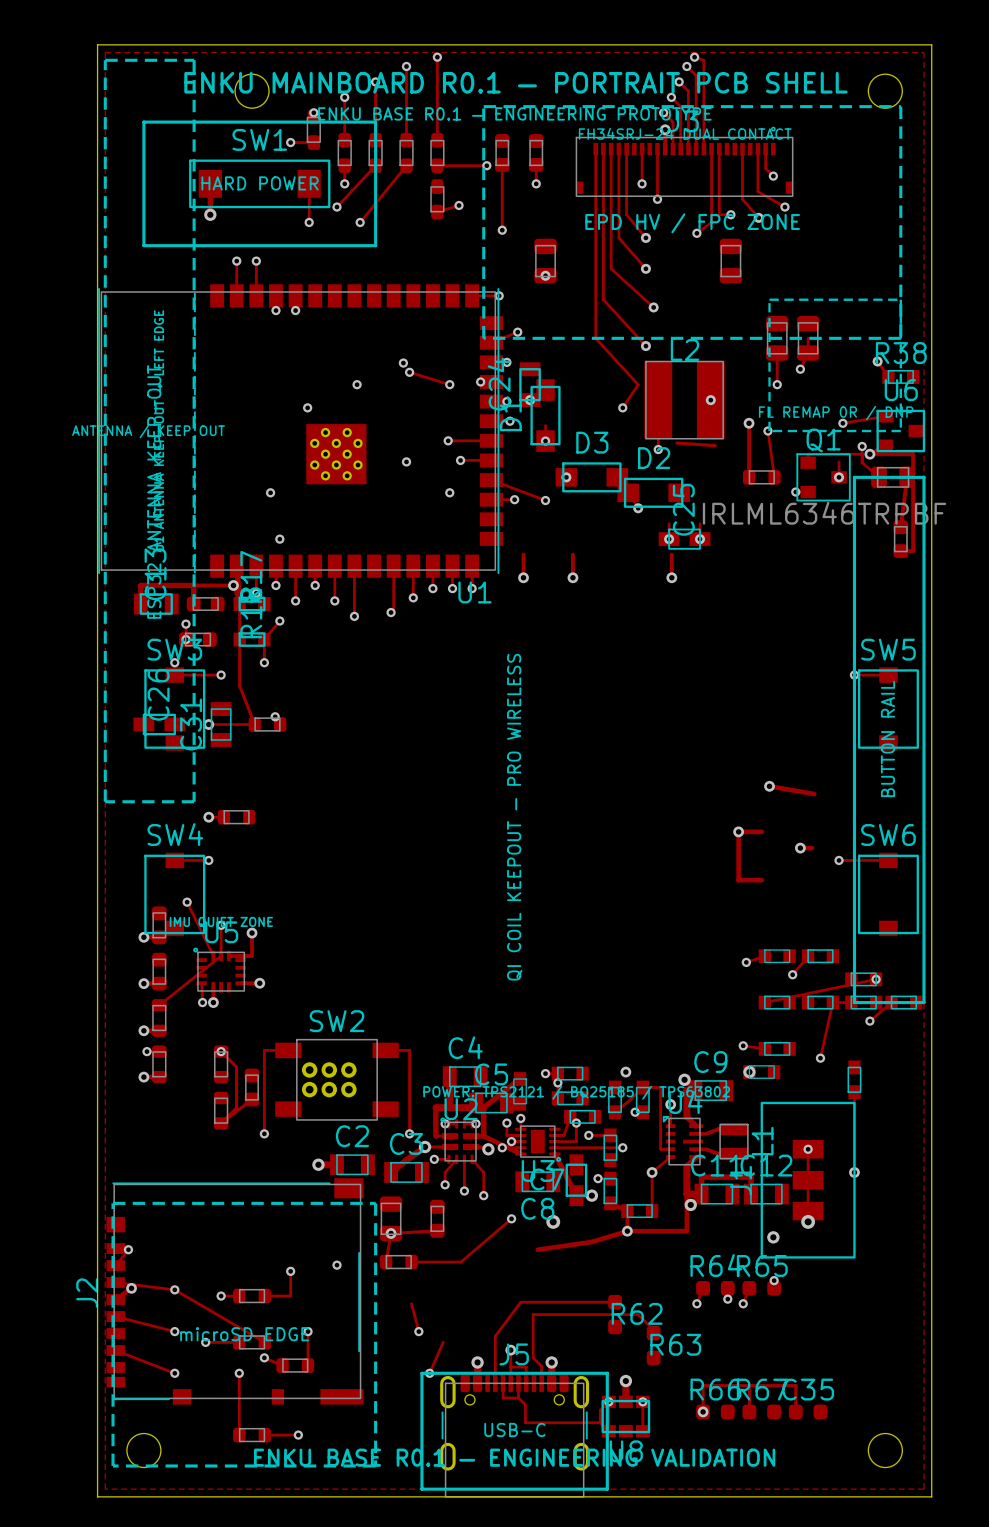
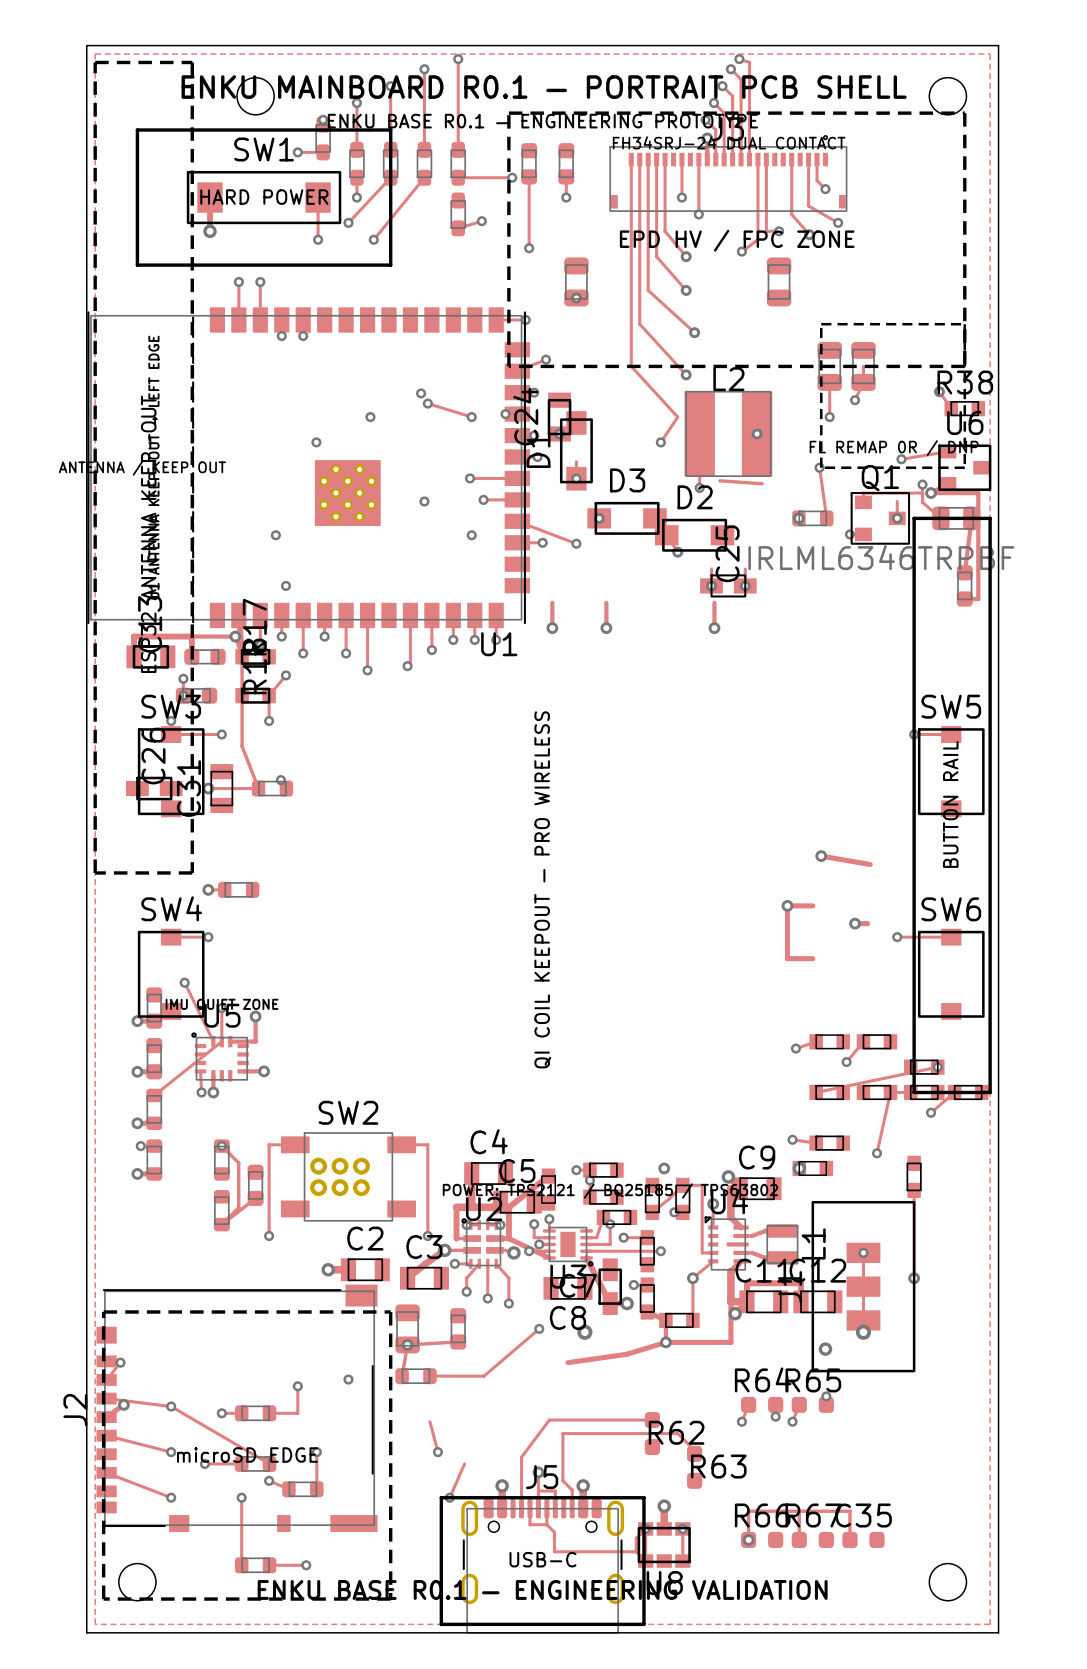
track: (749, 423) (749, 477) -> none
via position: (749, 423) -> (798, 518)

